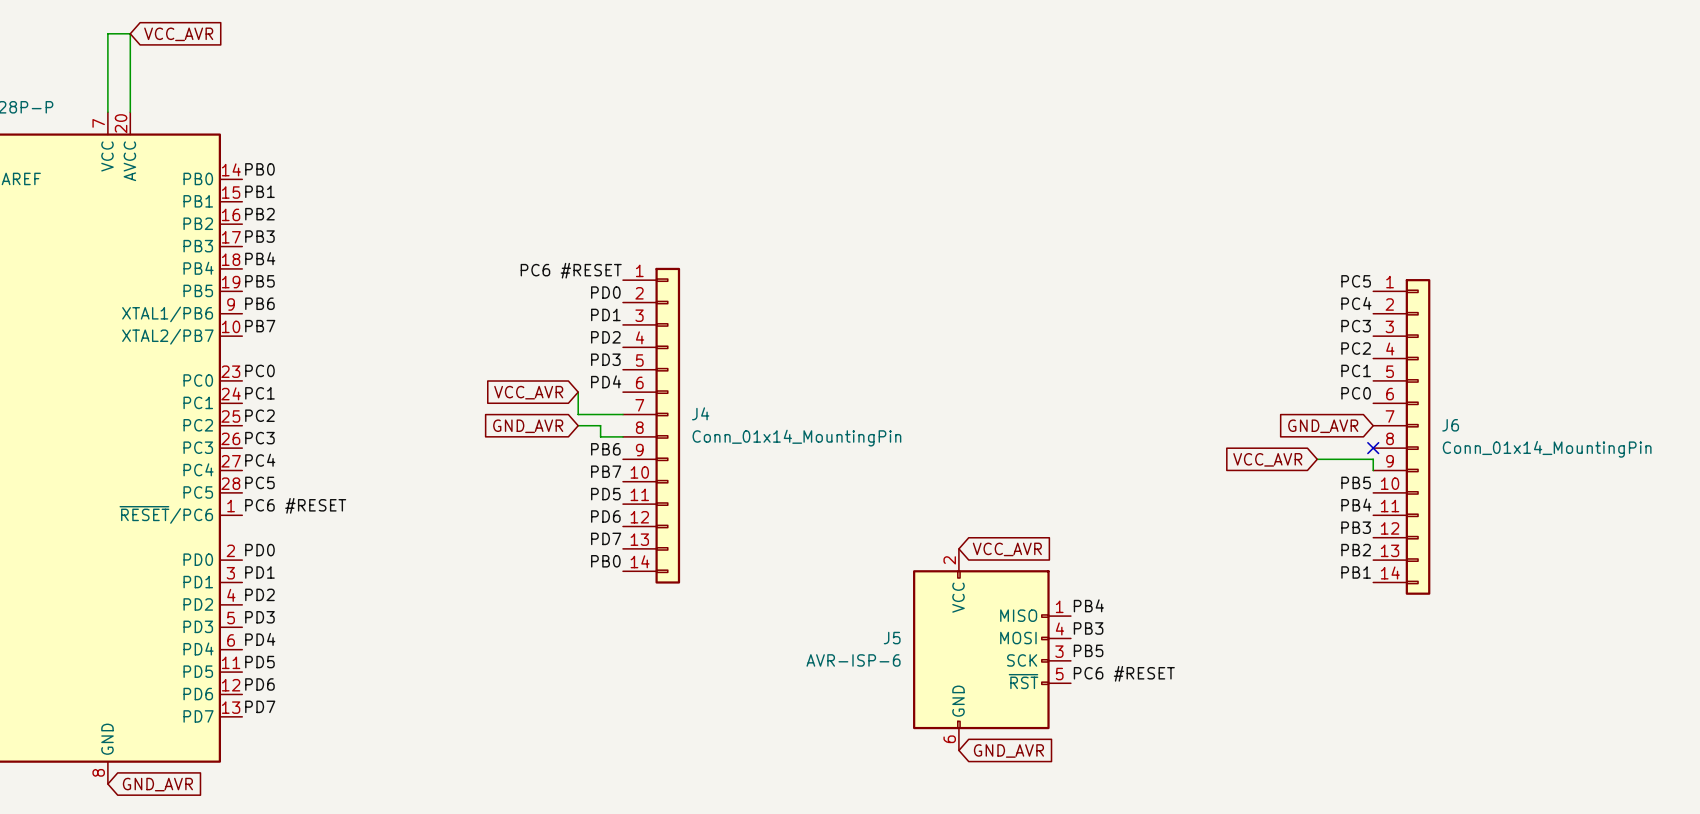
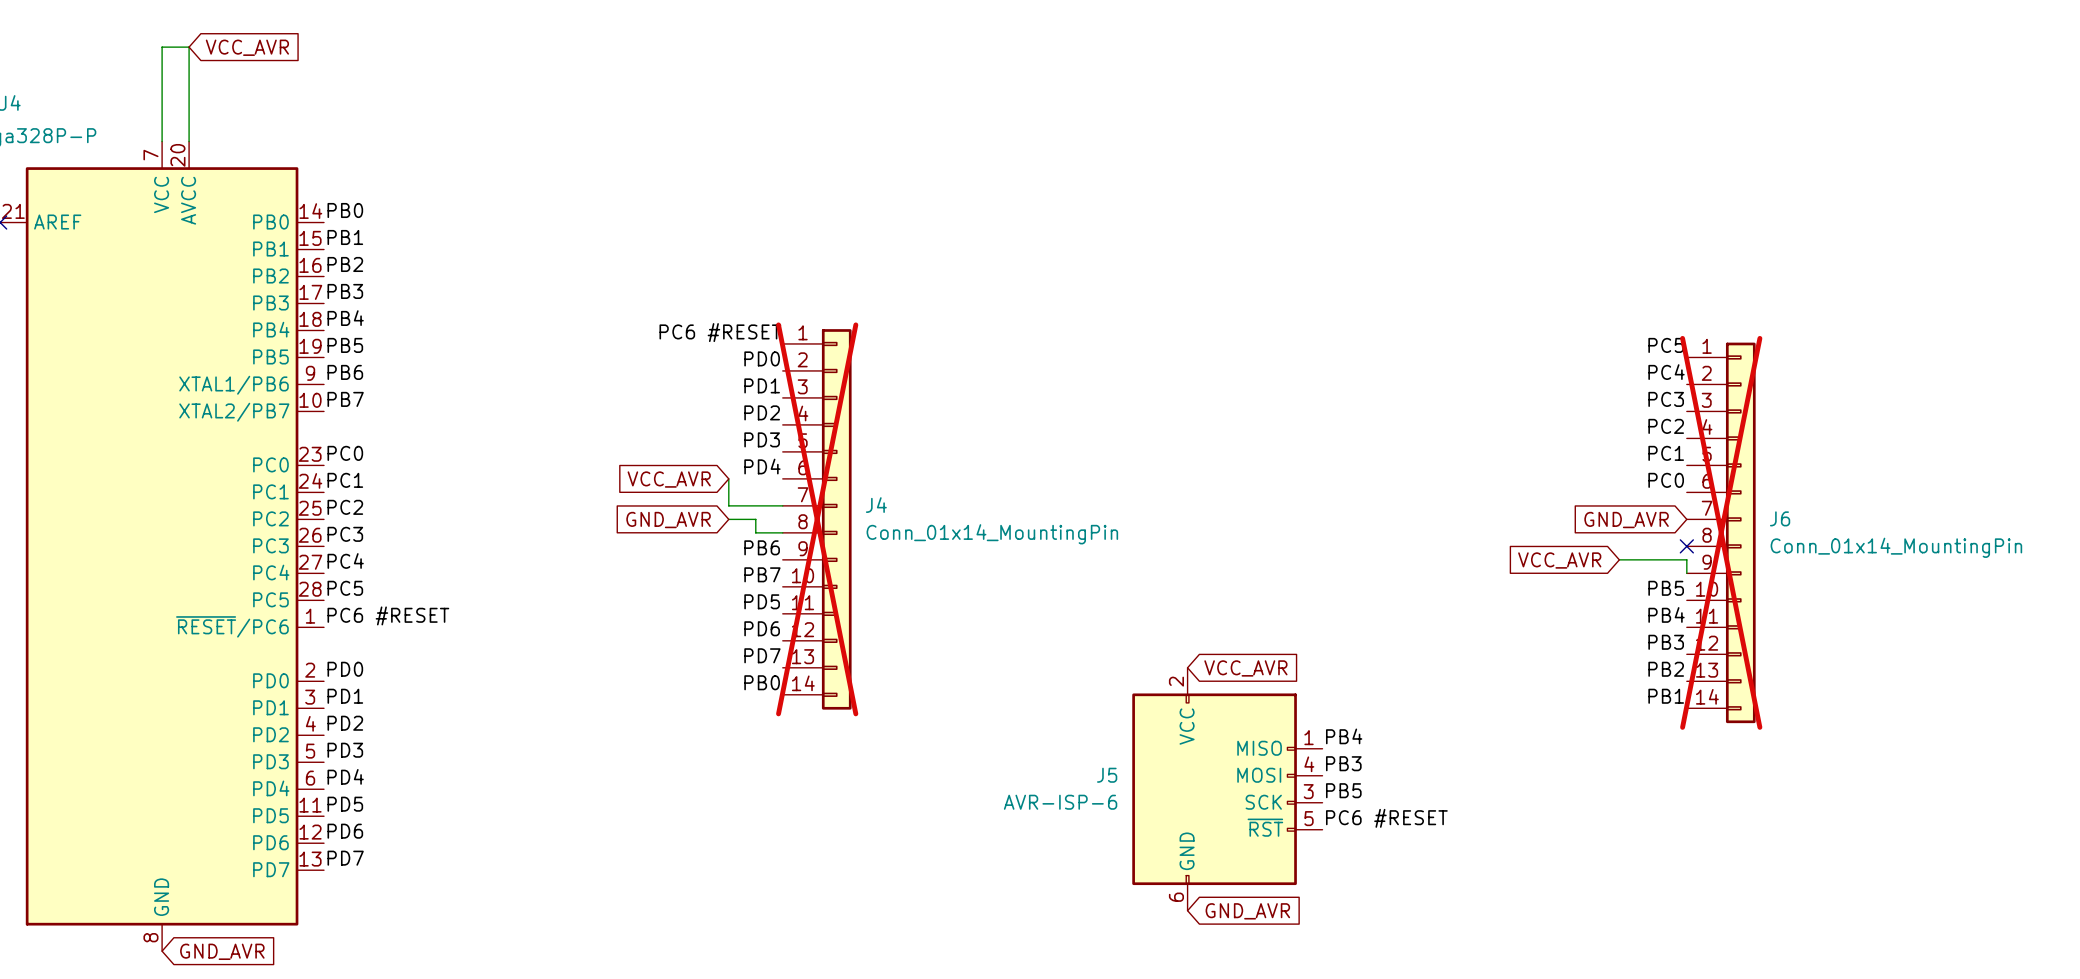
J4 do-not-place cross: none -> (817, 519)
J6 do-not-place cross: none -> (1721, 532)

